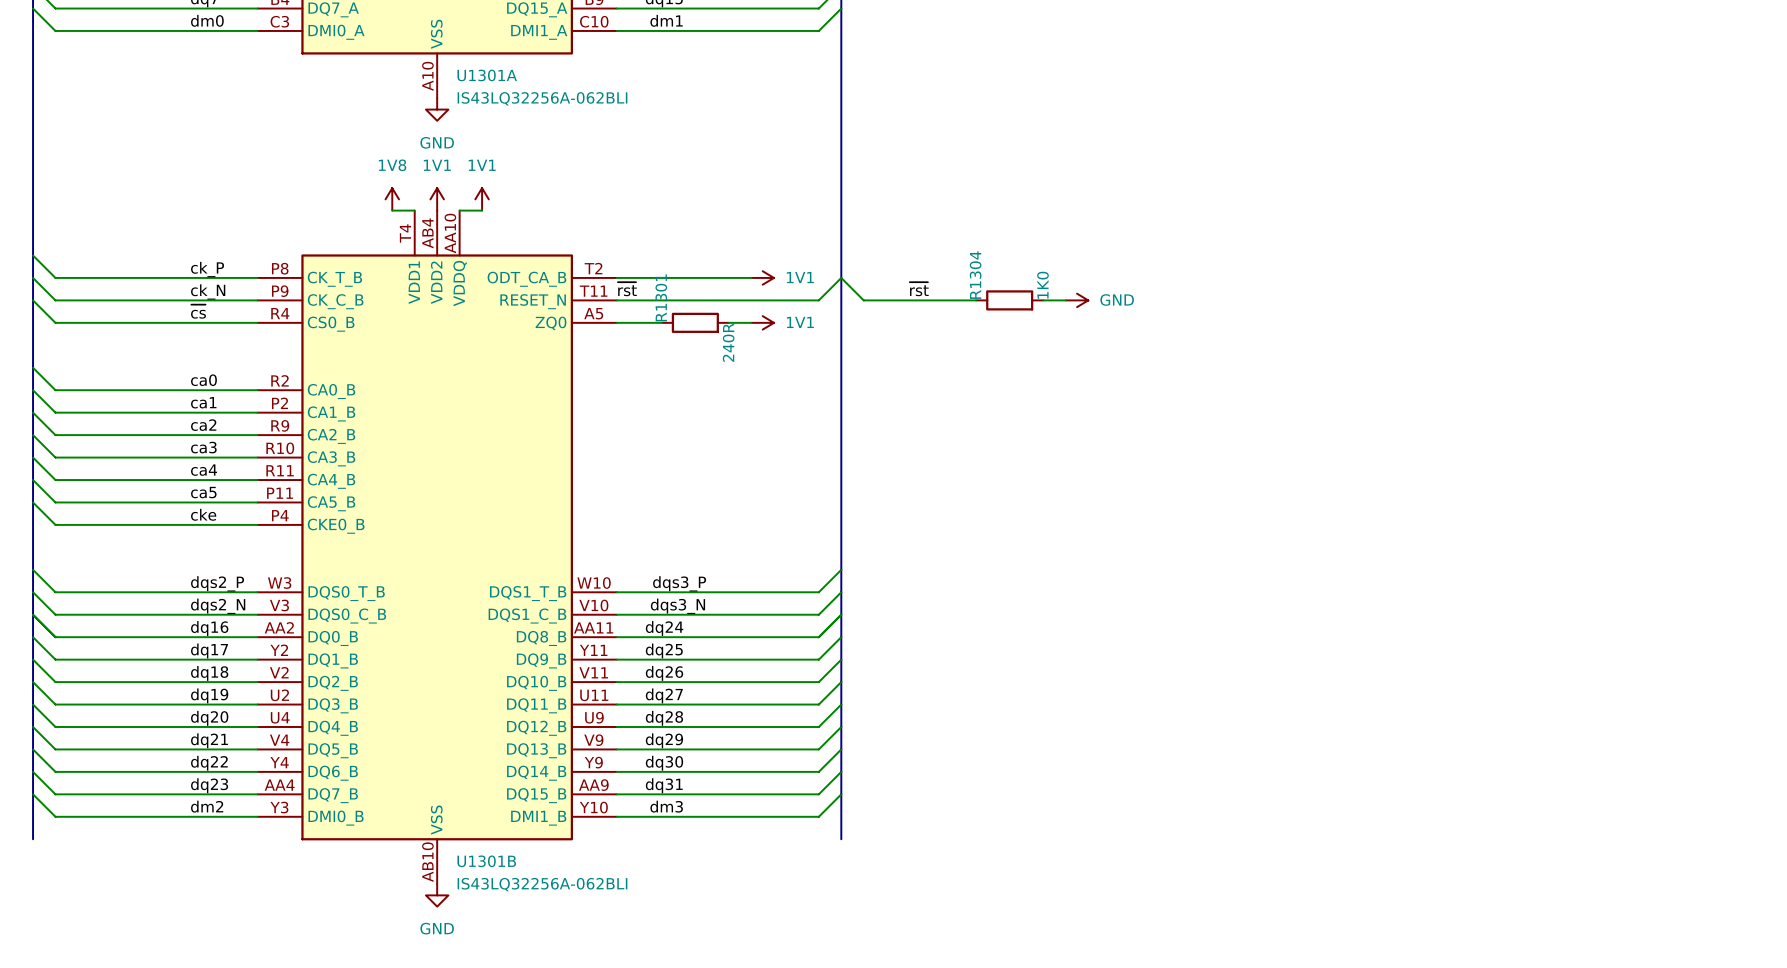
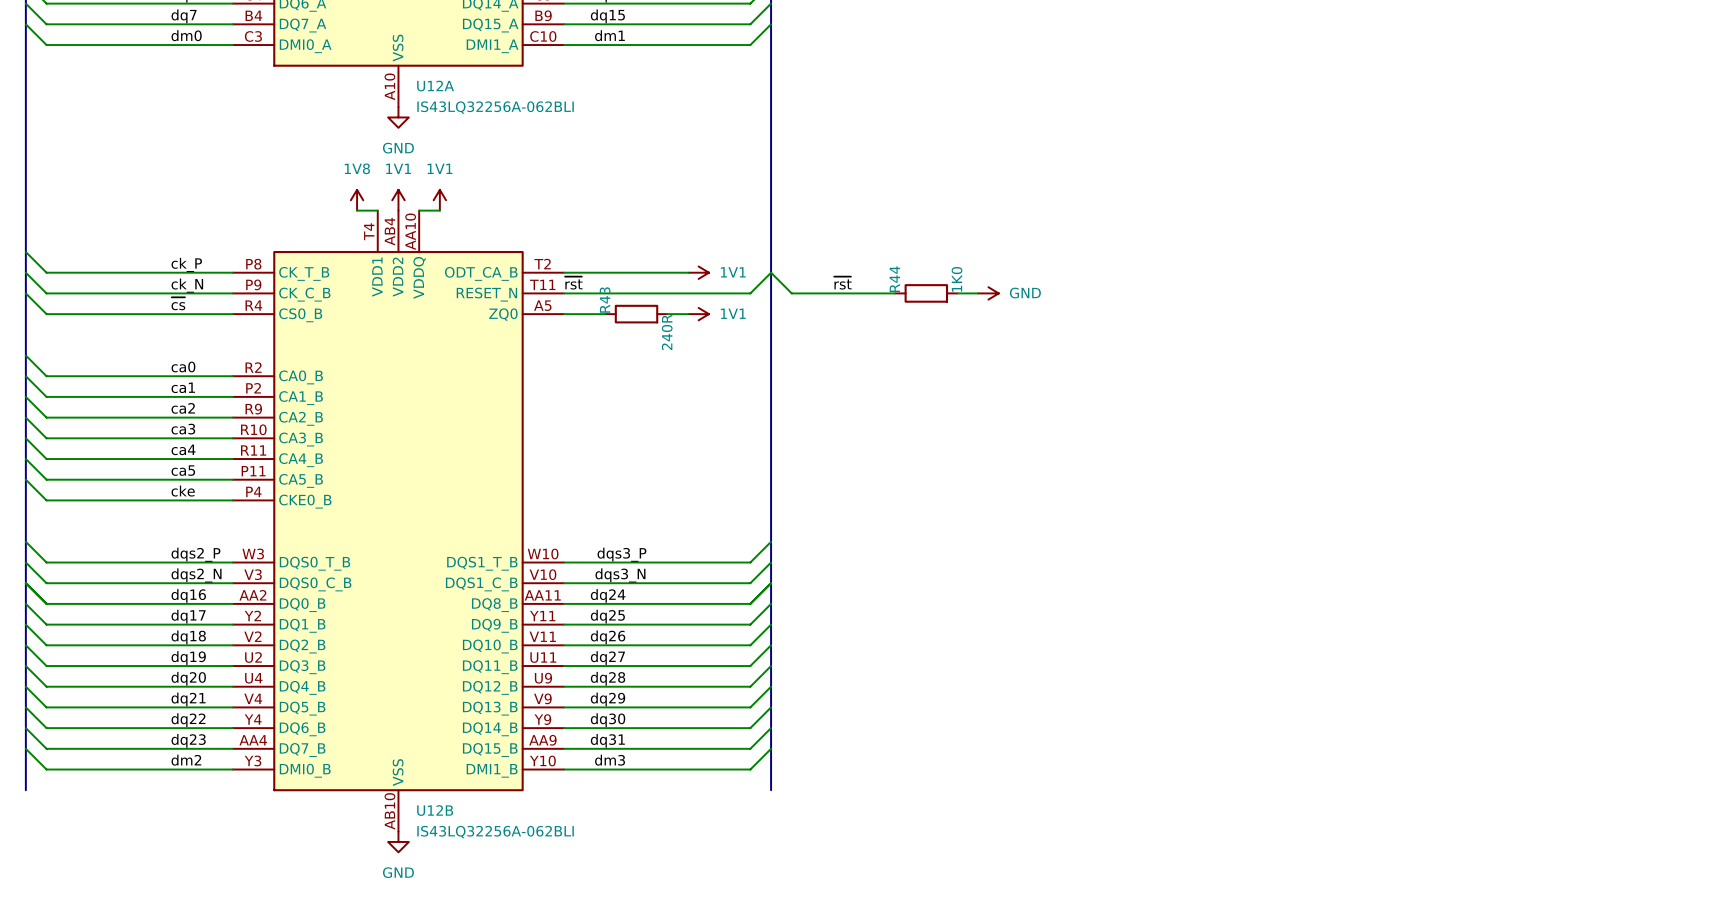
U1301A name: U1301A (487, 75) -> U12A (435, 86)
R1304 name: R1304 (975, 275) -> R44 (894, 279)
R1301 name: R1301 (661, 297) -> R43 (605, 300)
U1301B name: U1301B (486, 861) -> U12B (435, 810)

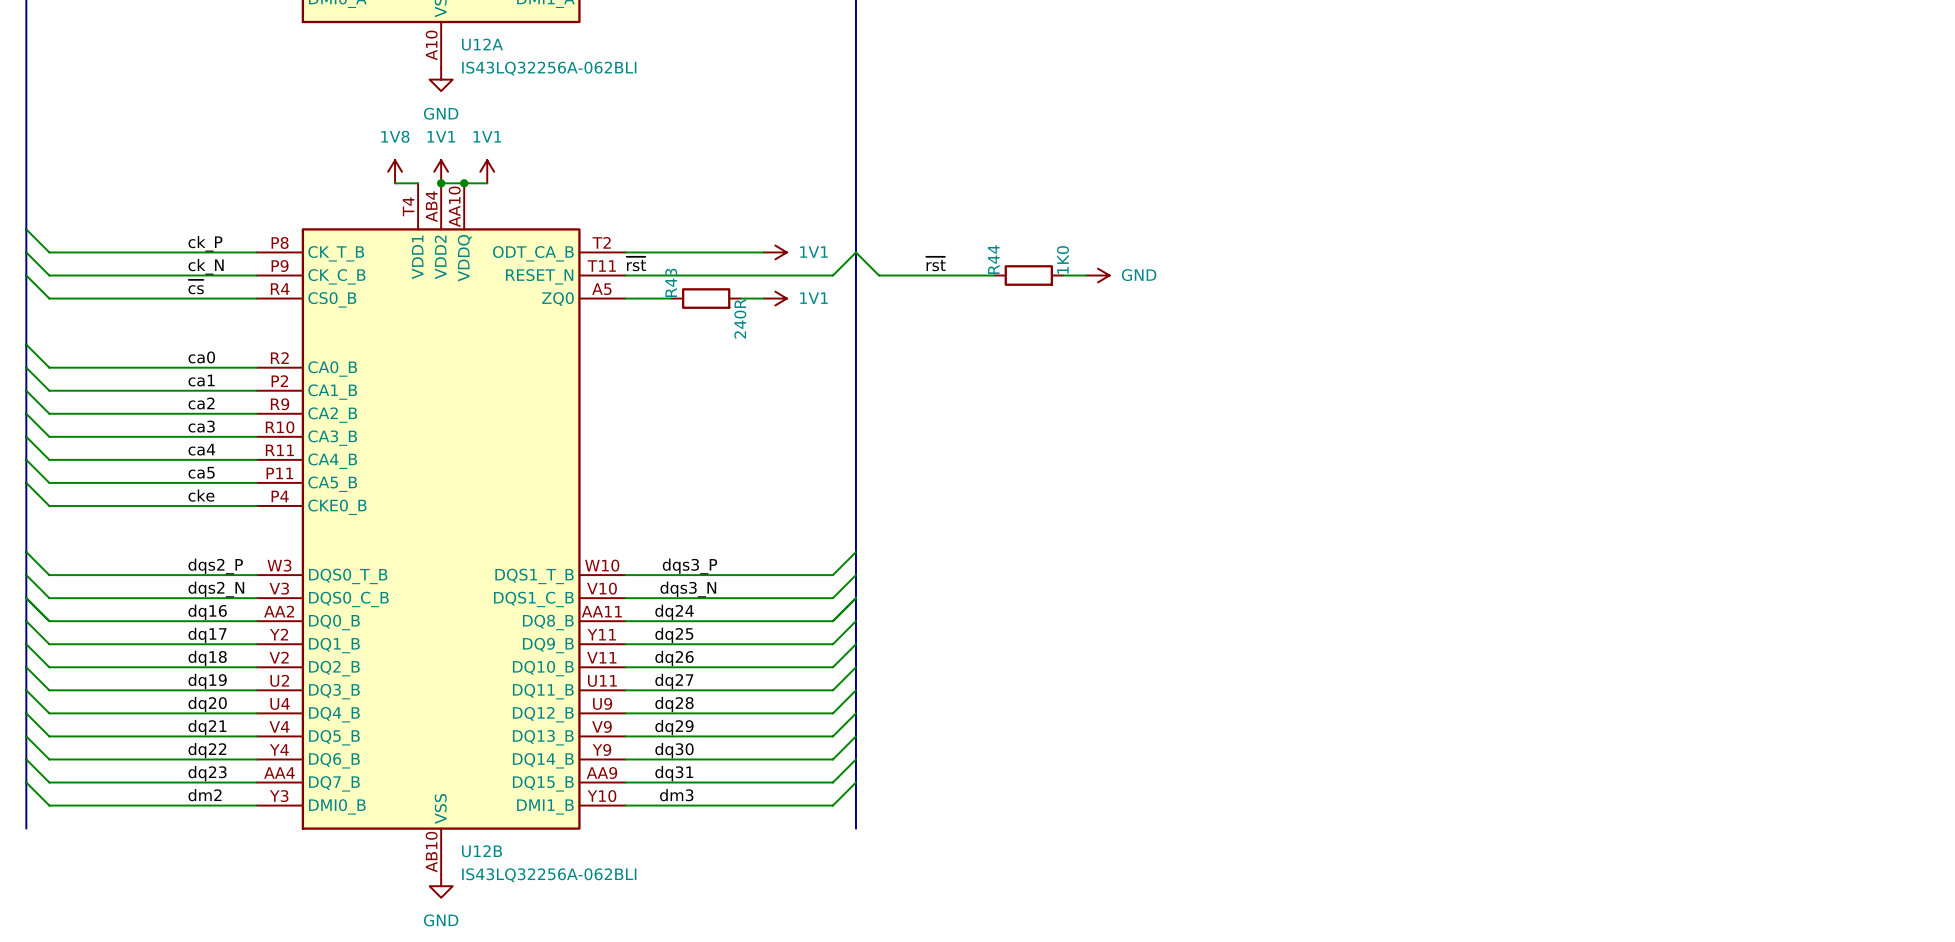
wire: none -> (441, 183) (464, 183)
junction: none -> (441, 183)
junction: none -> (464, 183)

